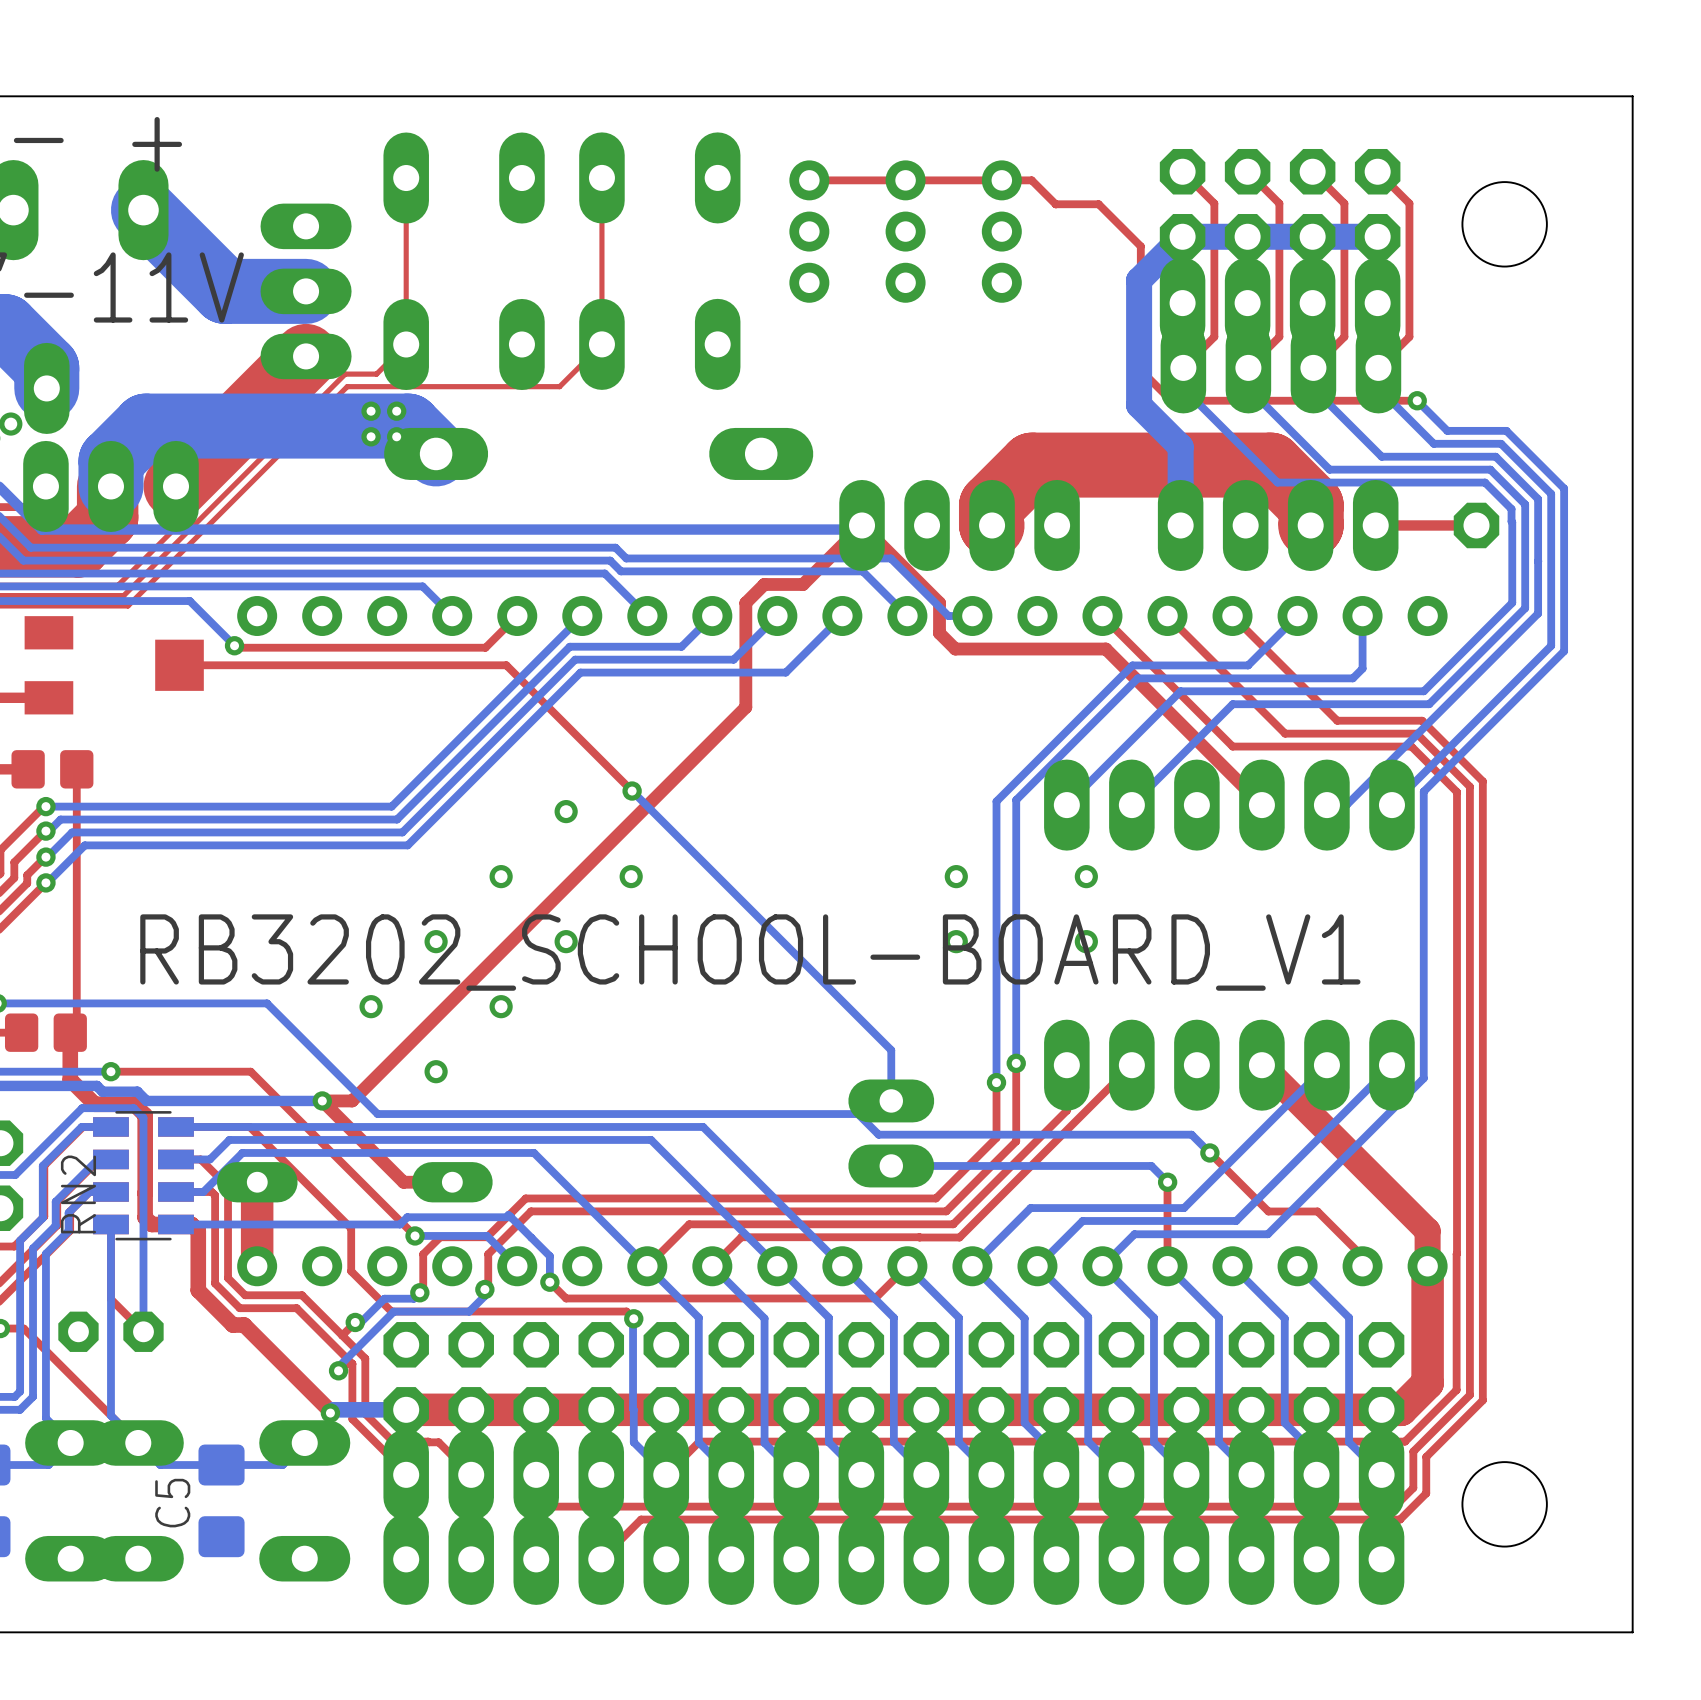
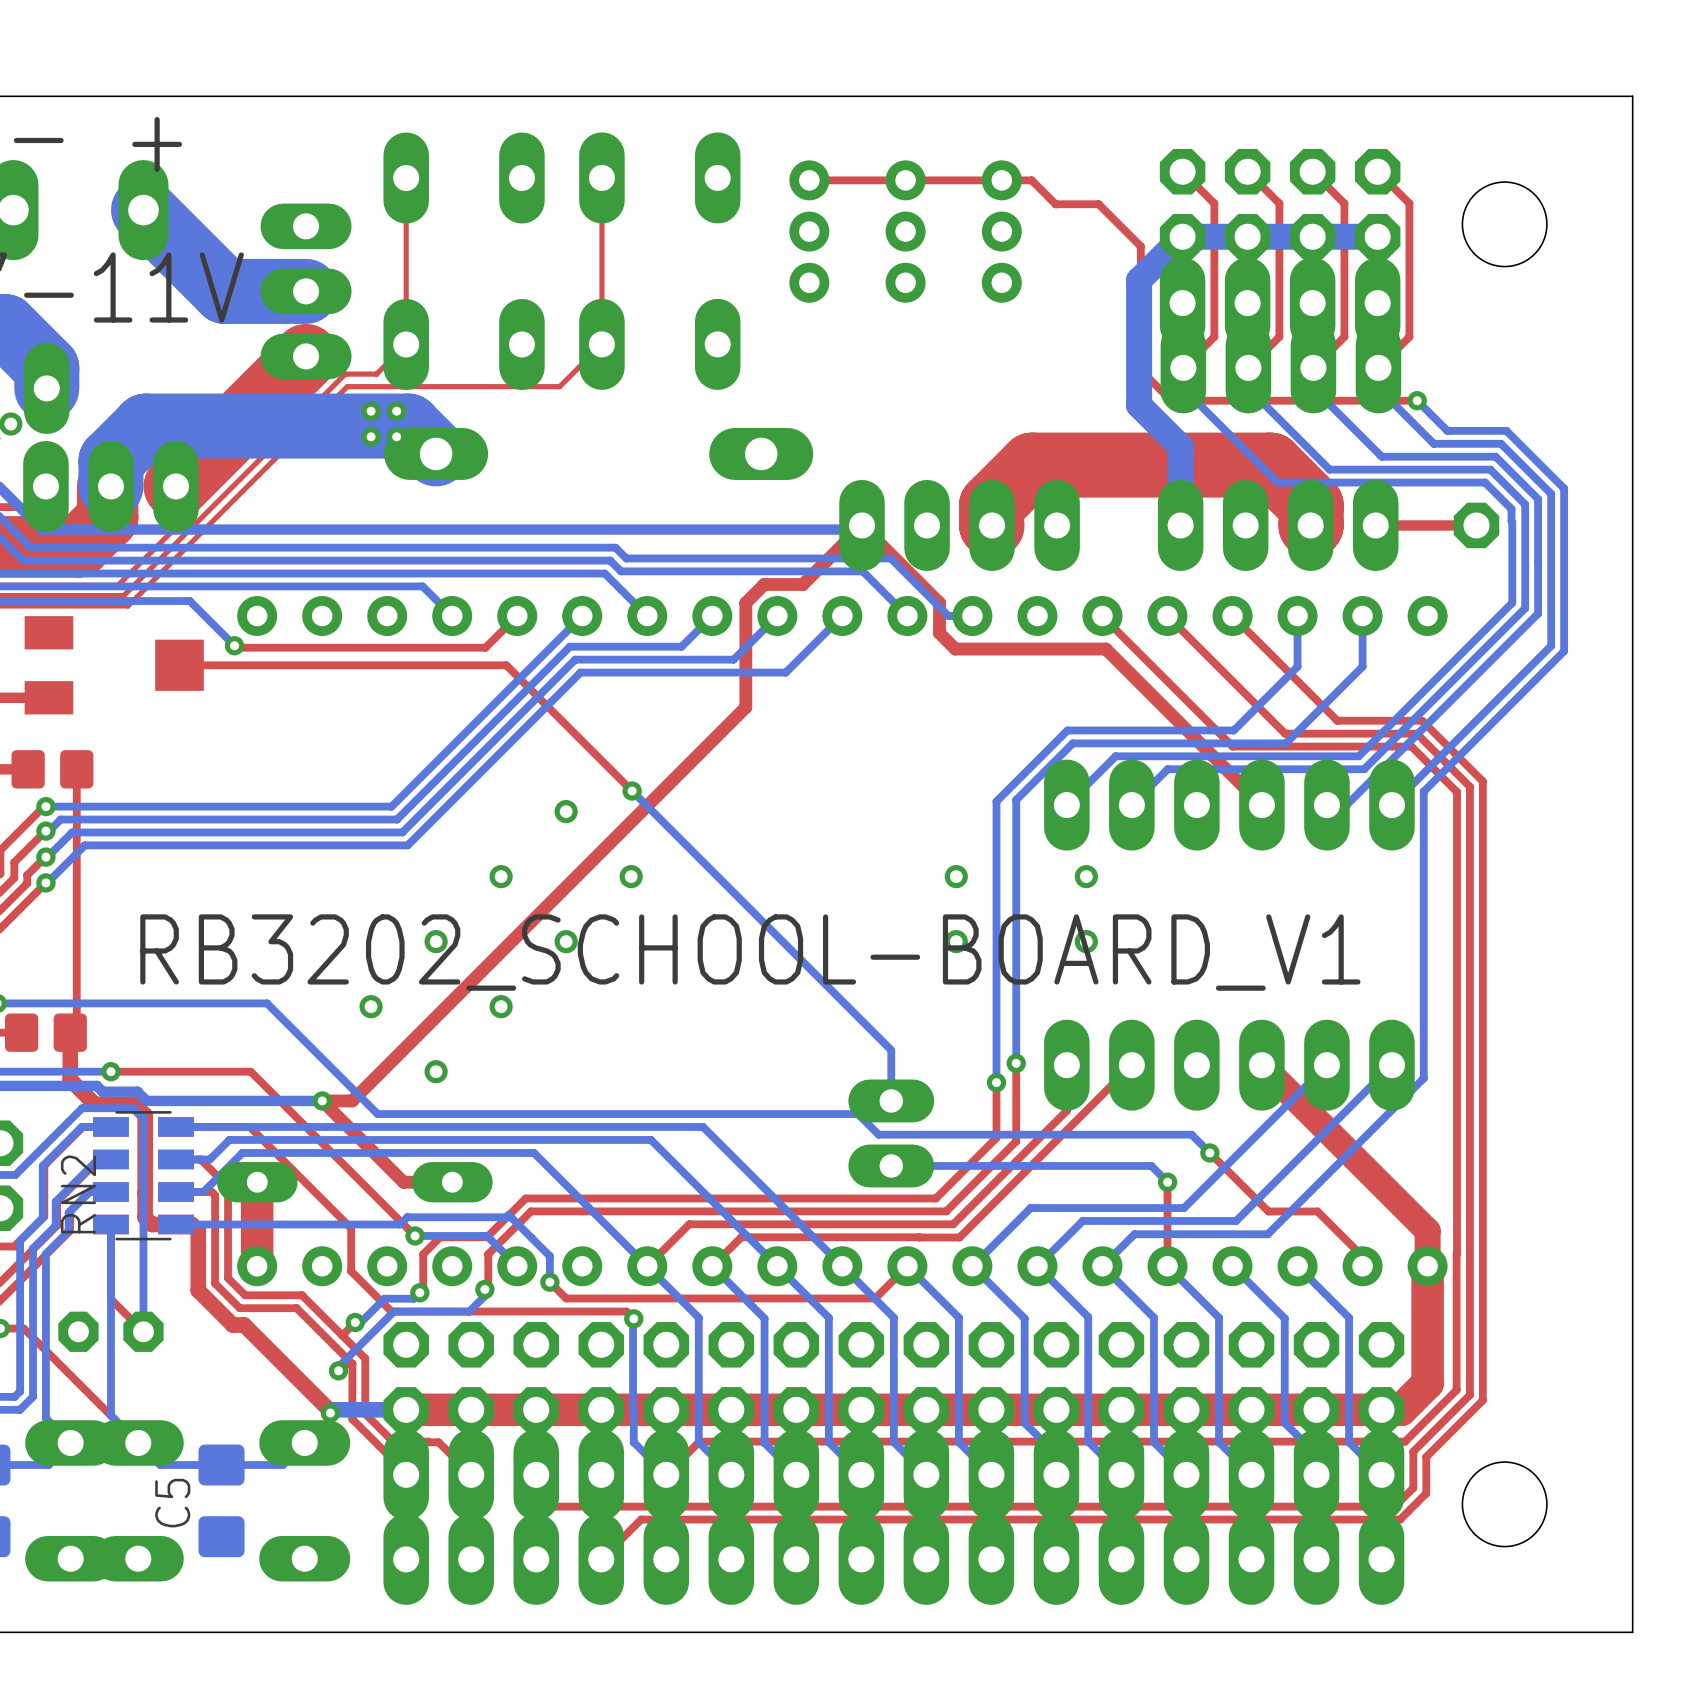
bottom track: (1297, 616) (1248, 665) (1132, 665) (1067, 730) -> (1297, 616) (1297, 666) (1233, 730) (1067, 730)
bottom track: (1362, 666) (1352, 678) (1137, 678) (1072, 743) -> (1362, 666) (1285, 743) (1072, 743)
bottom track: (1423, 691) (1180, 691) (1115, 756) -> (1423, 691) (1358, 756) (1115, 756)
bottom track: (1429, 704) (1232, 704) (1167, 769) -> (1429, 704) (1364, 769) (1167, 769)

